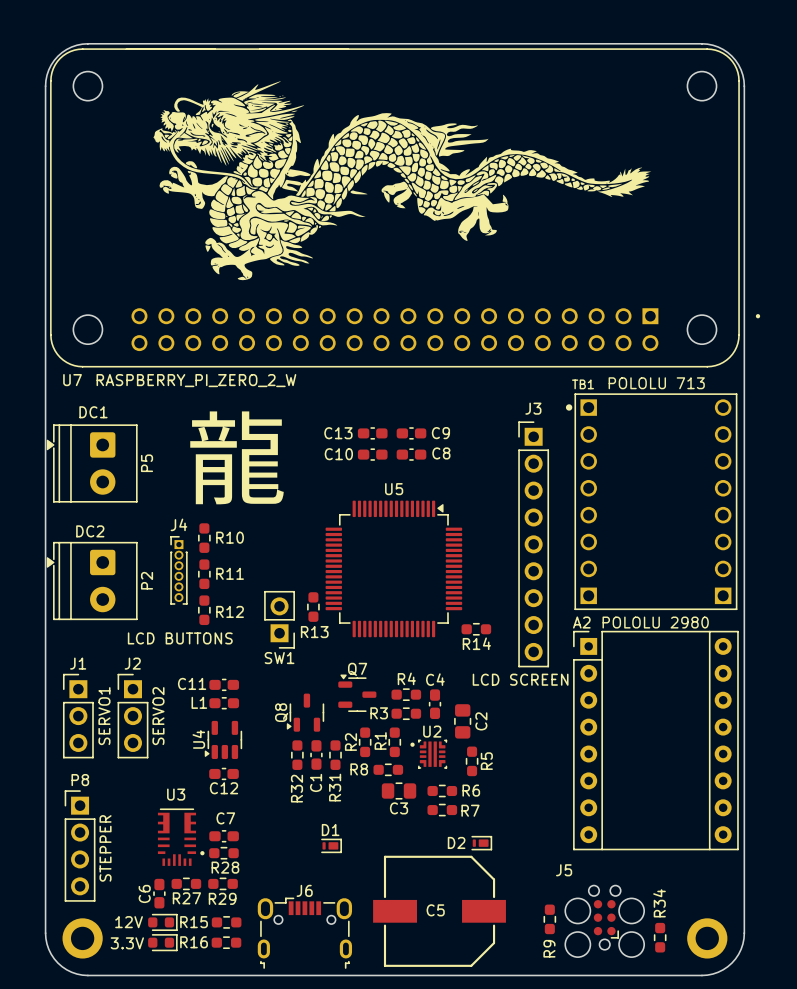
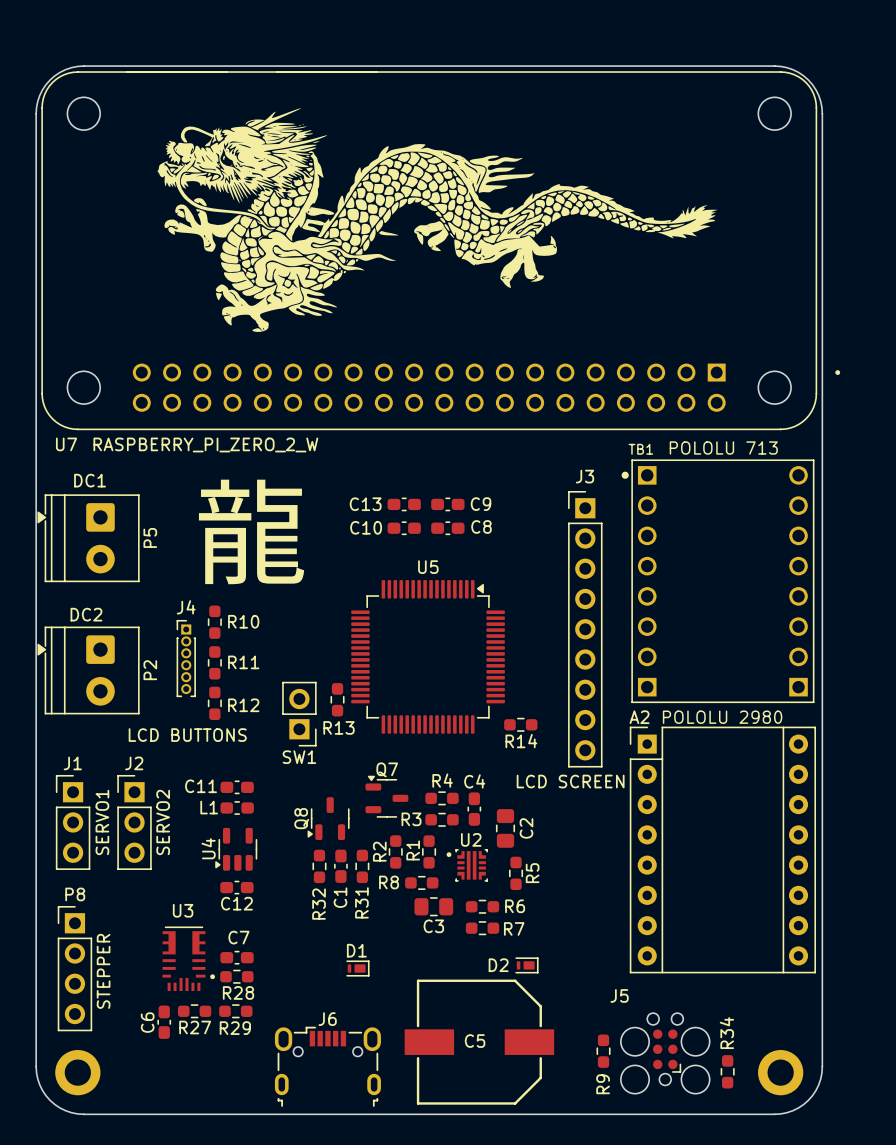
part: 12V (162, 922) -> none
R15: (226, 922) -> none
part: 3.3V (162, 942) -> none
R16: (226, 942) -> none

